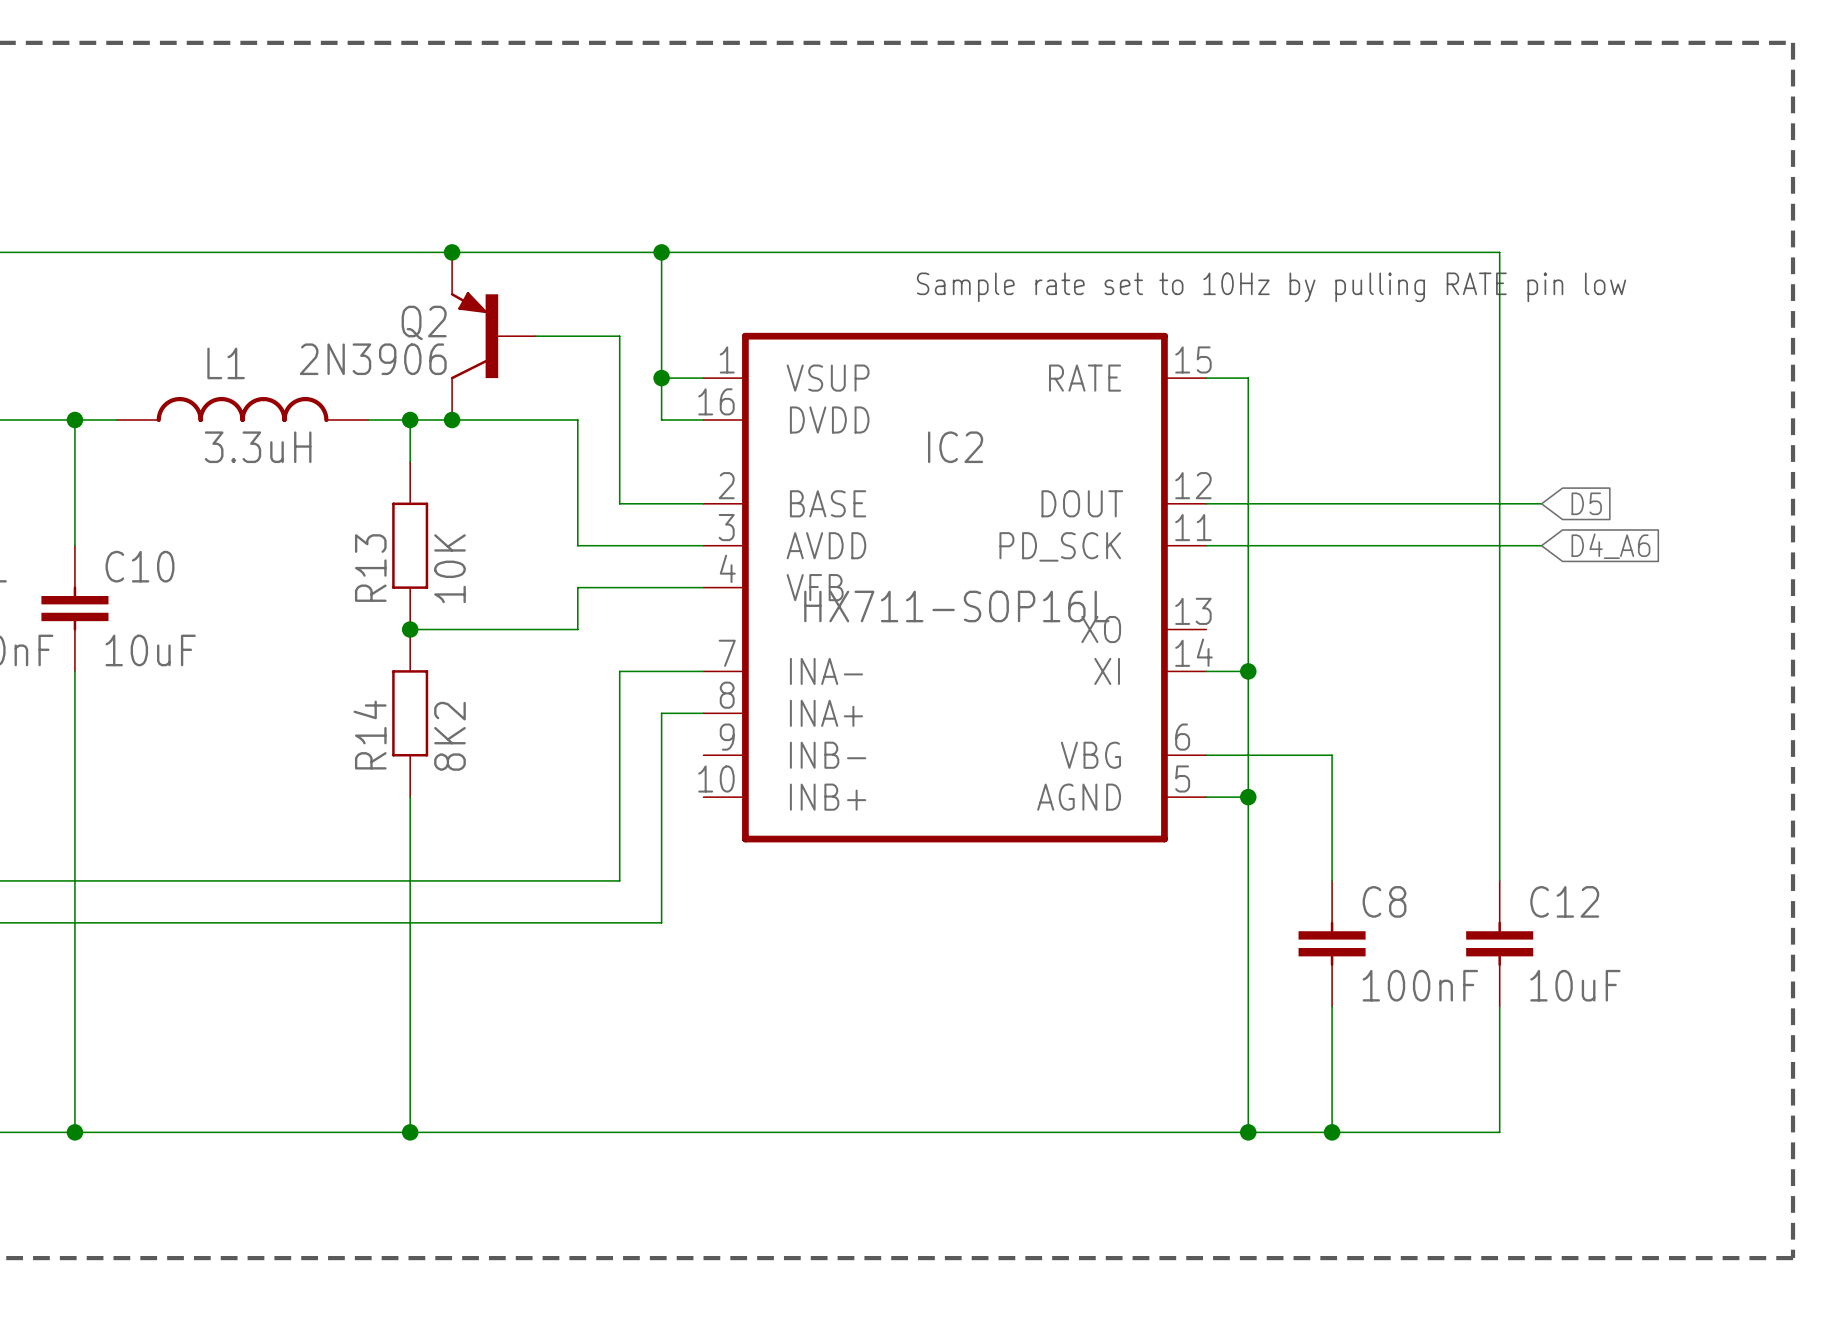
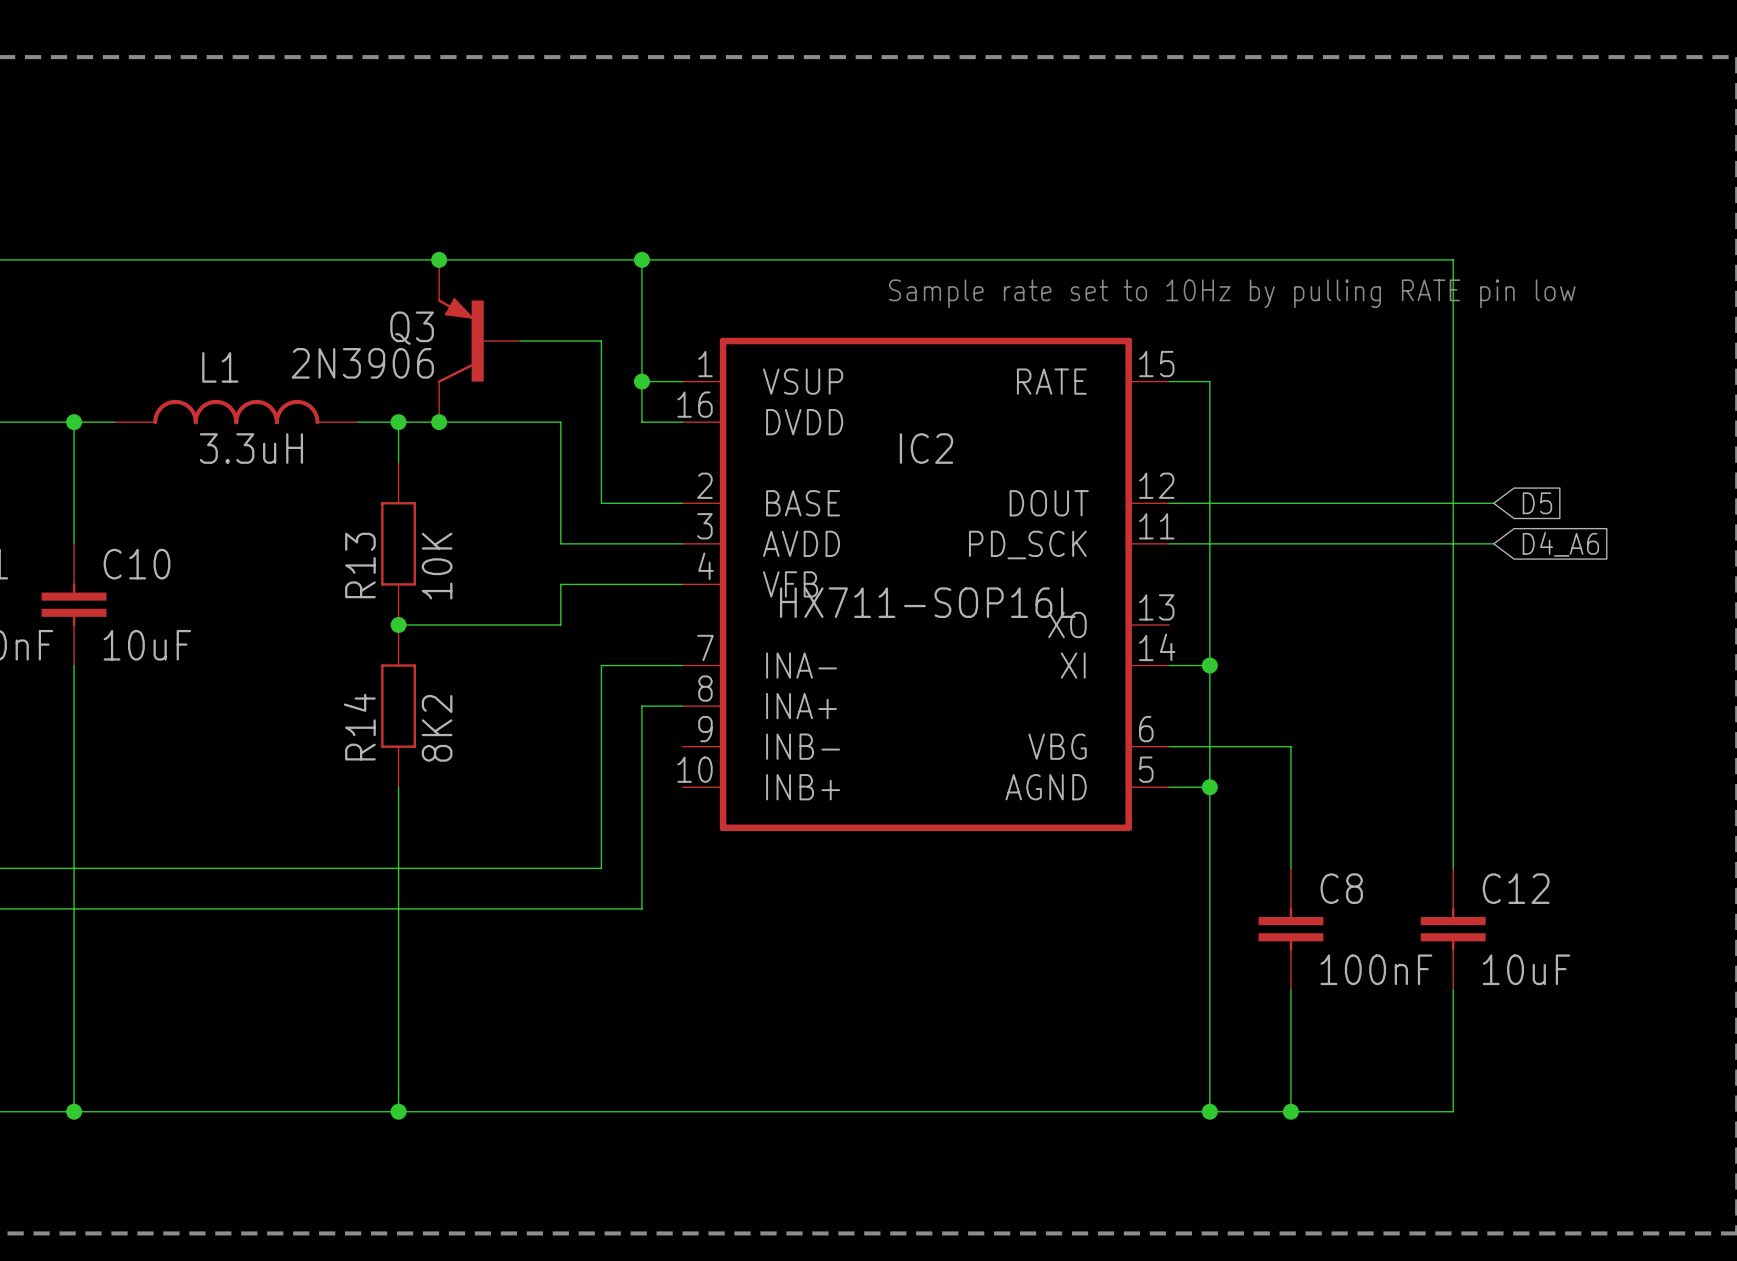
Q2 name: Q2 (424, 322) -> Q3 (412, 328)

